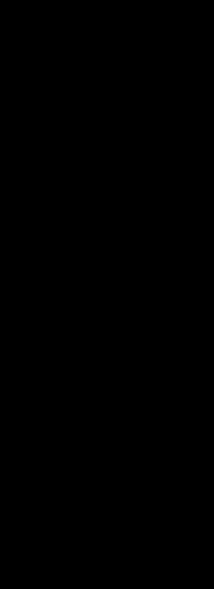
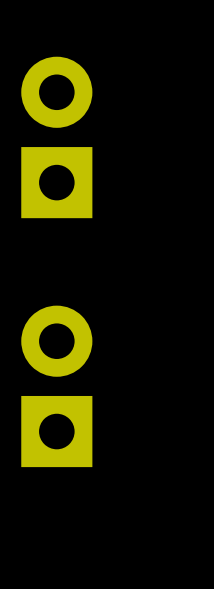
part: none -> (56, 137)
part: none -> (56, 386)

